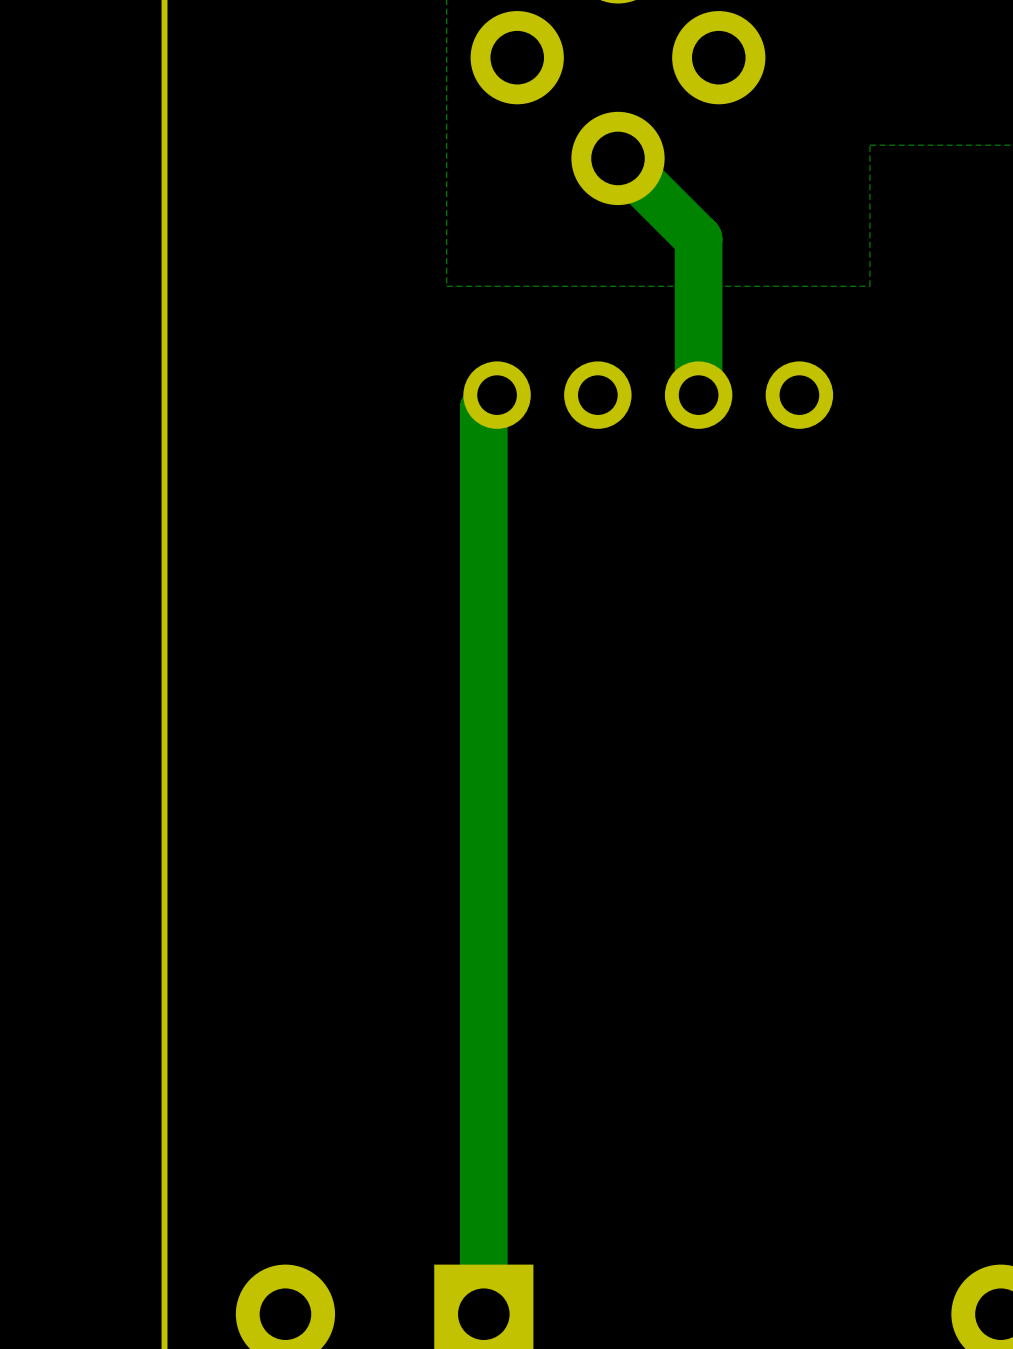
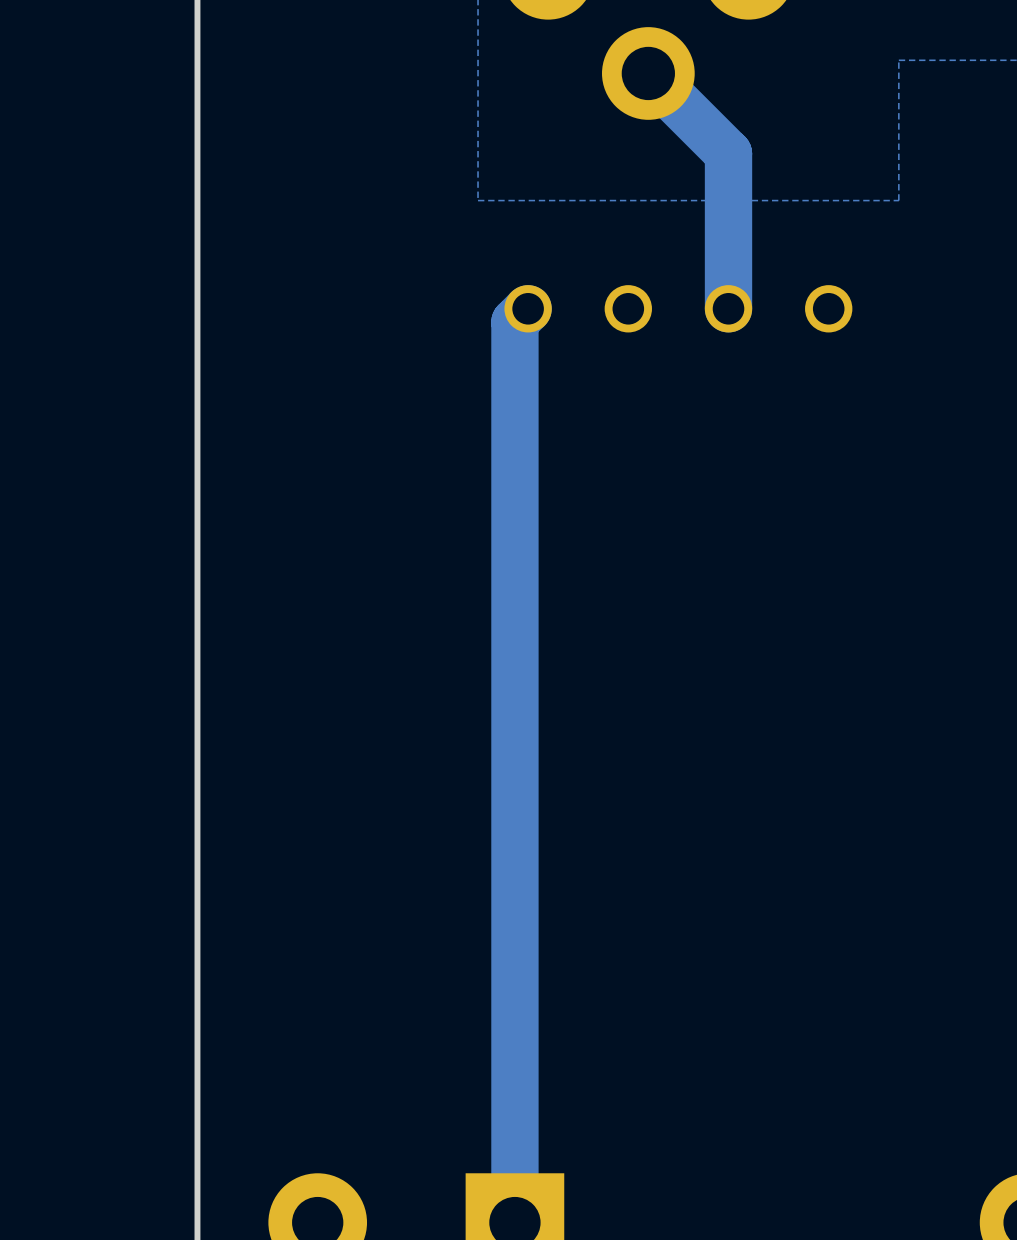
part footprint: [463, 361, 834, 429] -> [504, 285, 853, 333]

